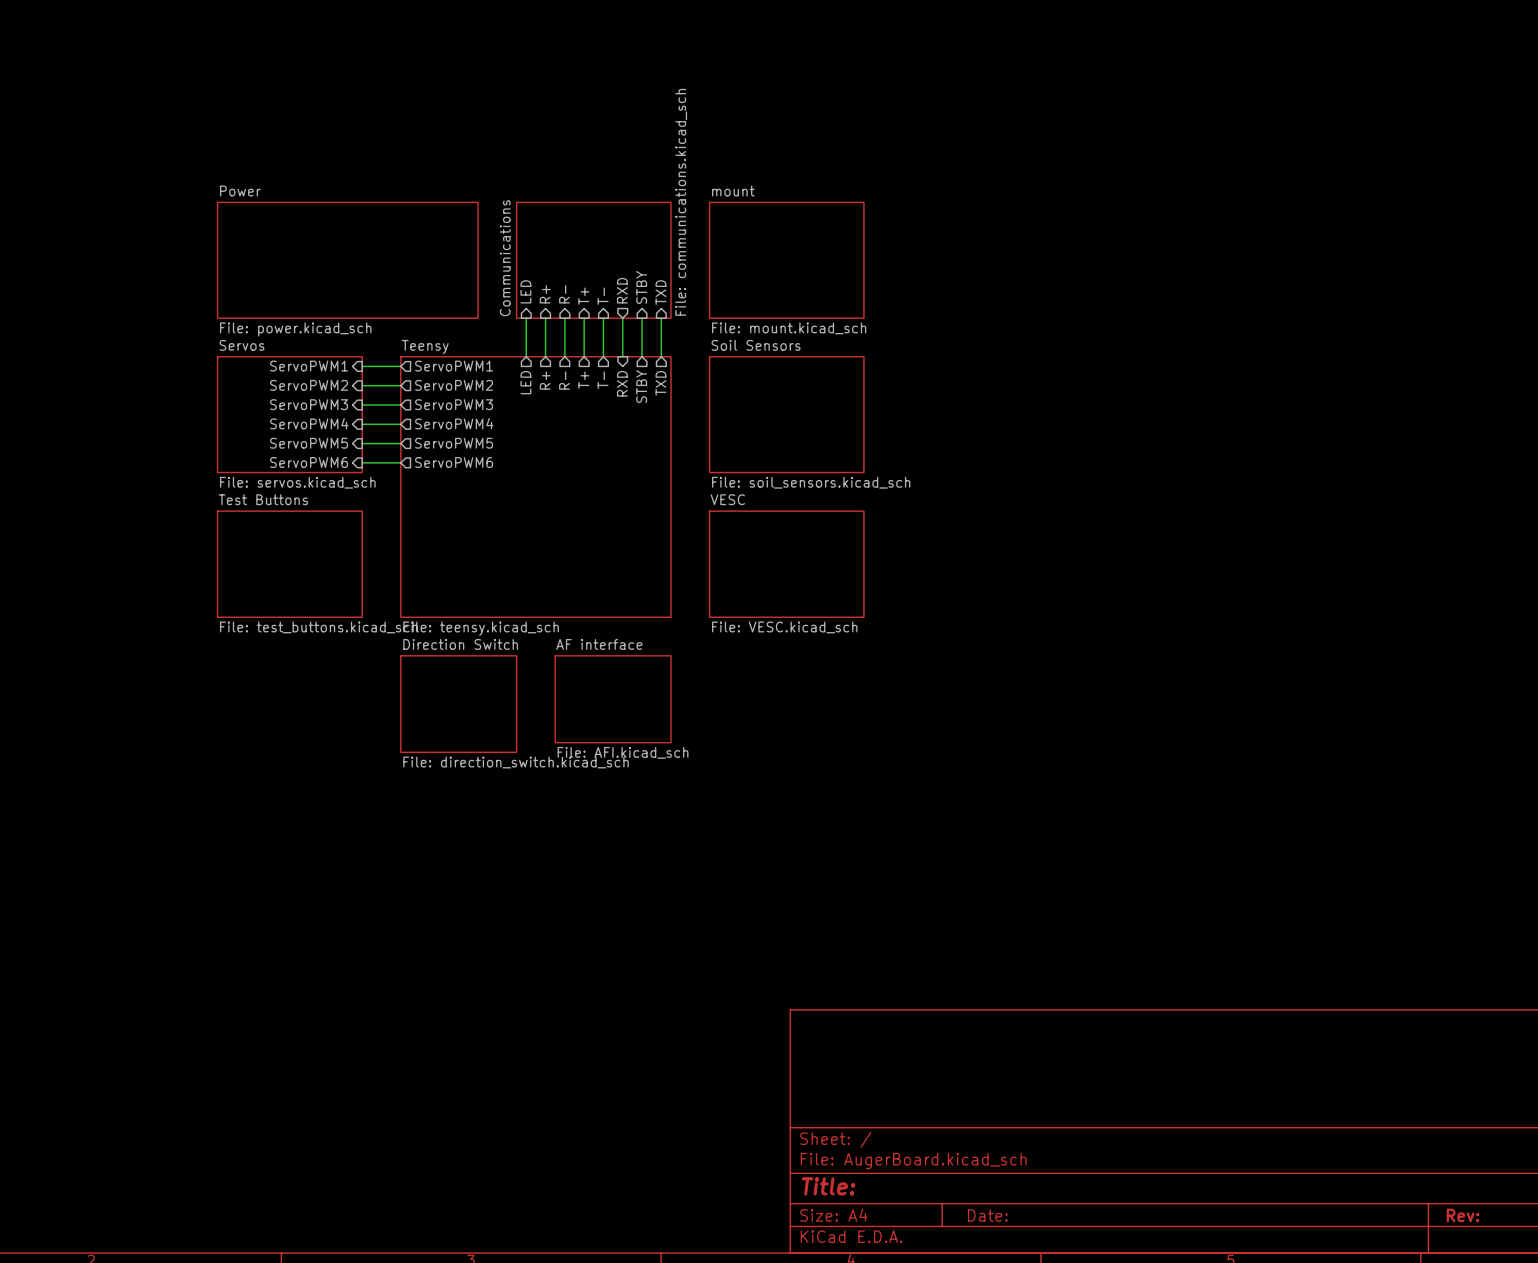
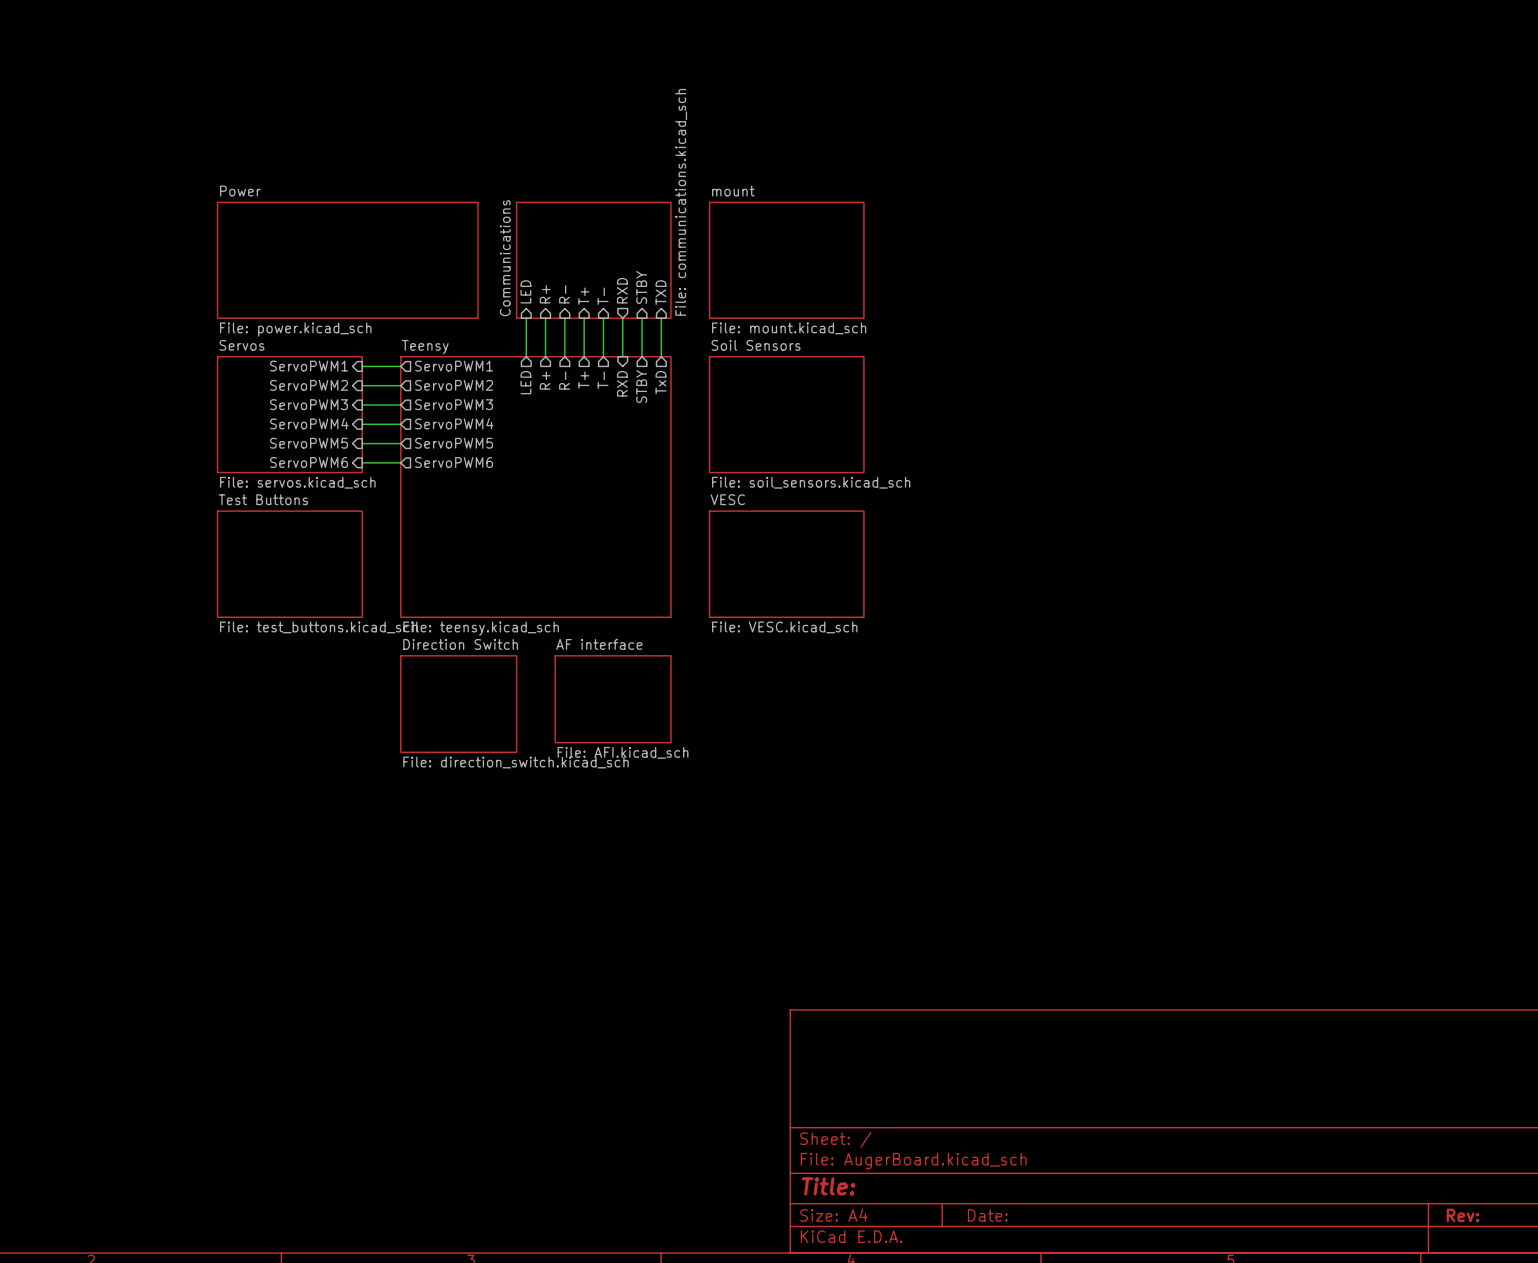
sheet pin: TXD (660, 383) -> TxD (660, 382)

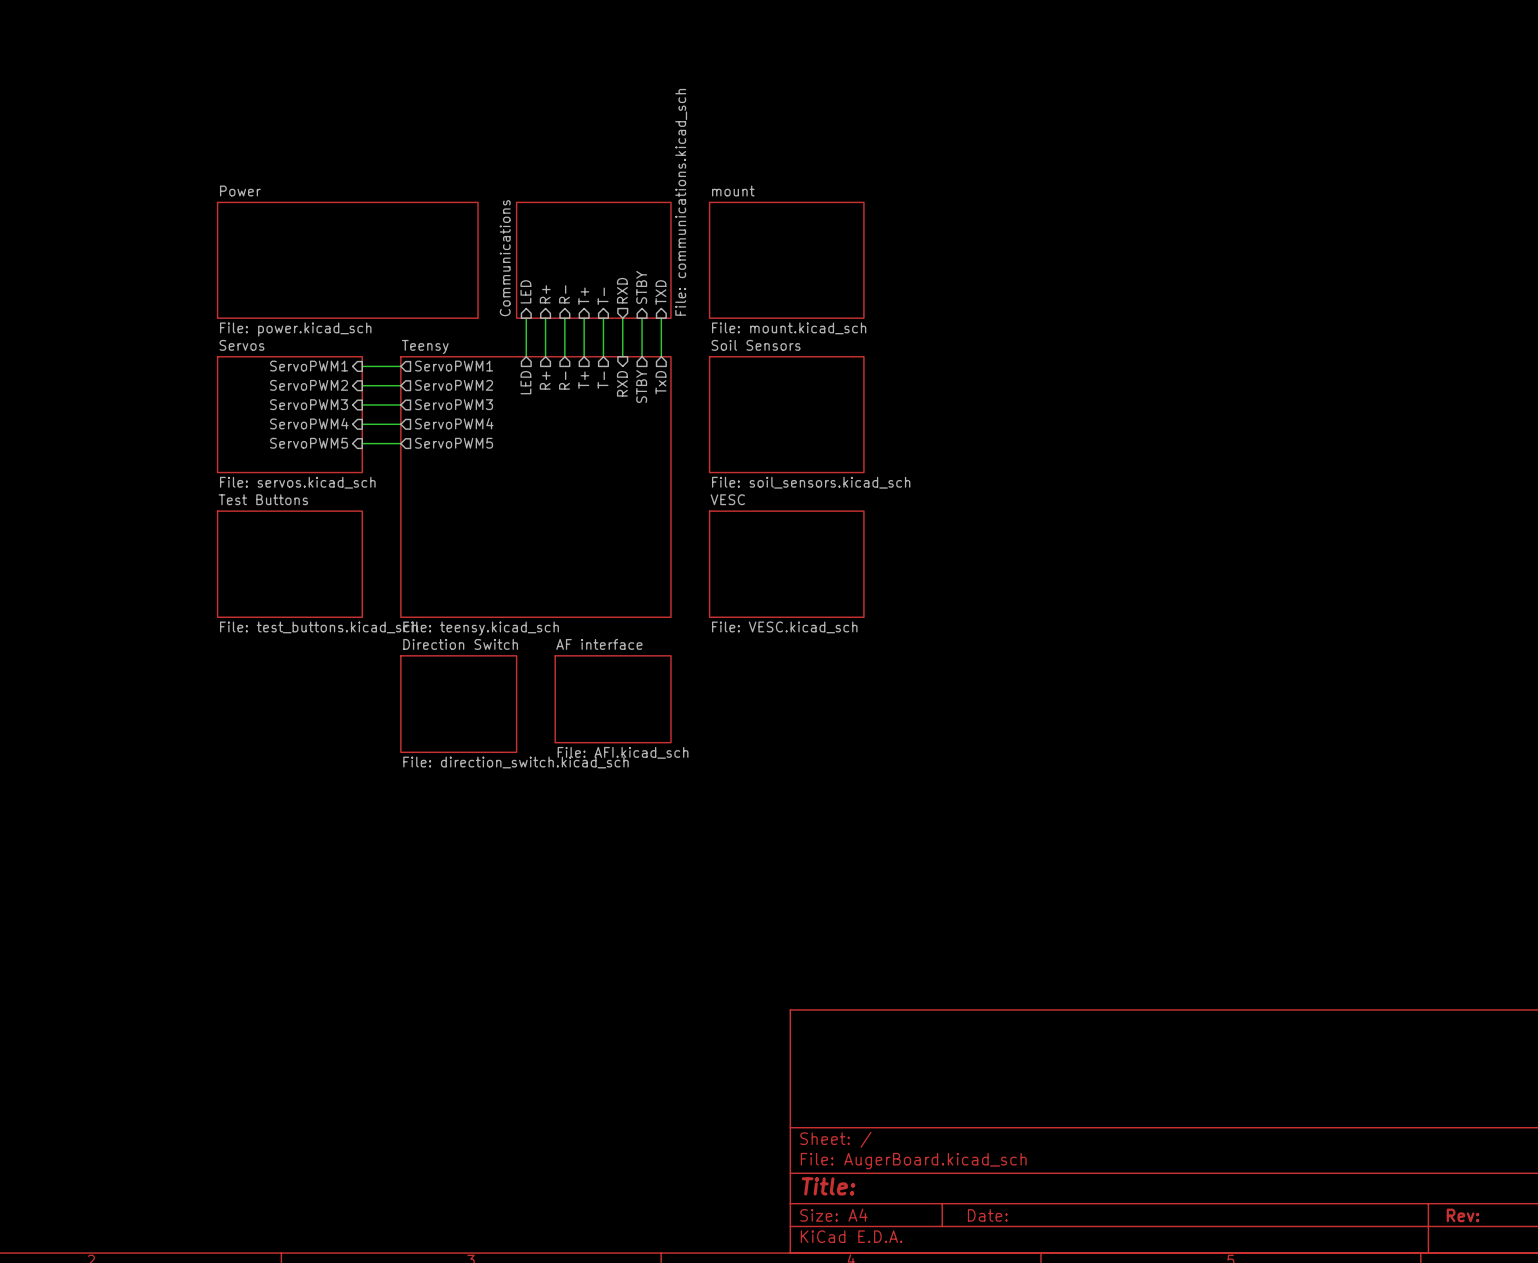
sheet pin: ServoPWM6 (309, 462) -> none
wire: (362, 462) (400, 462) -> none
sheet pin: ServoPWM6 (454, 462) -> none

